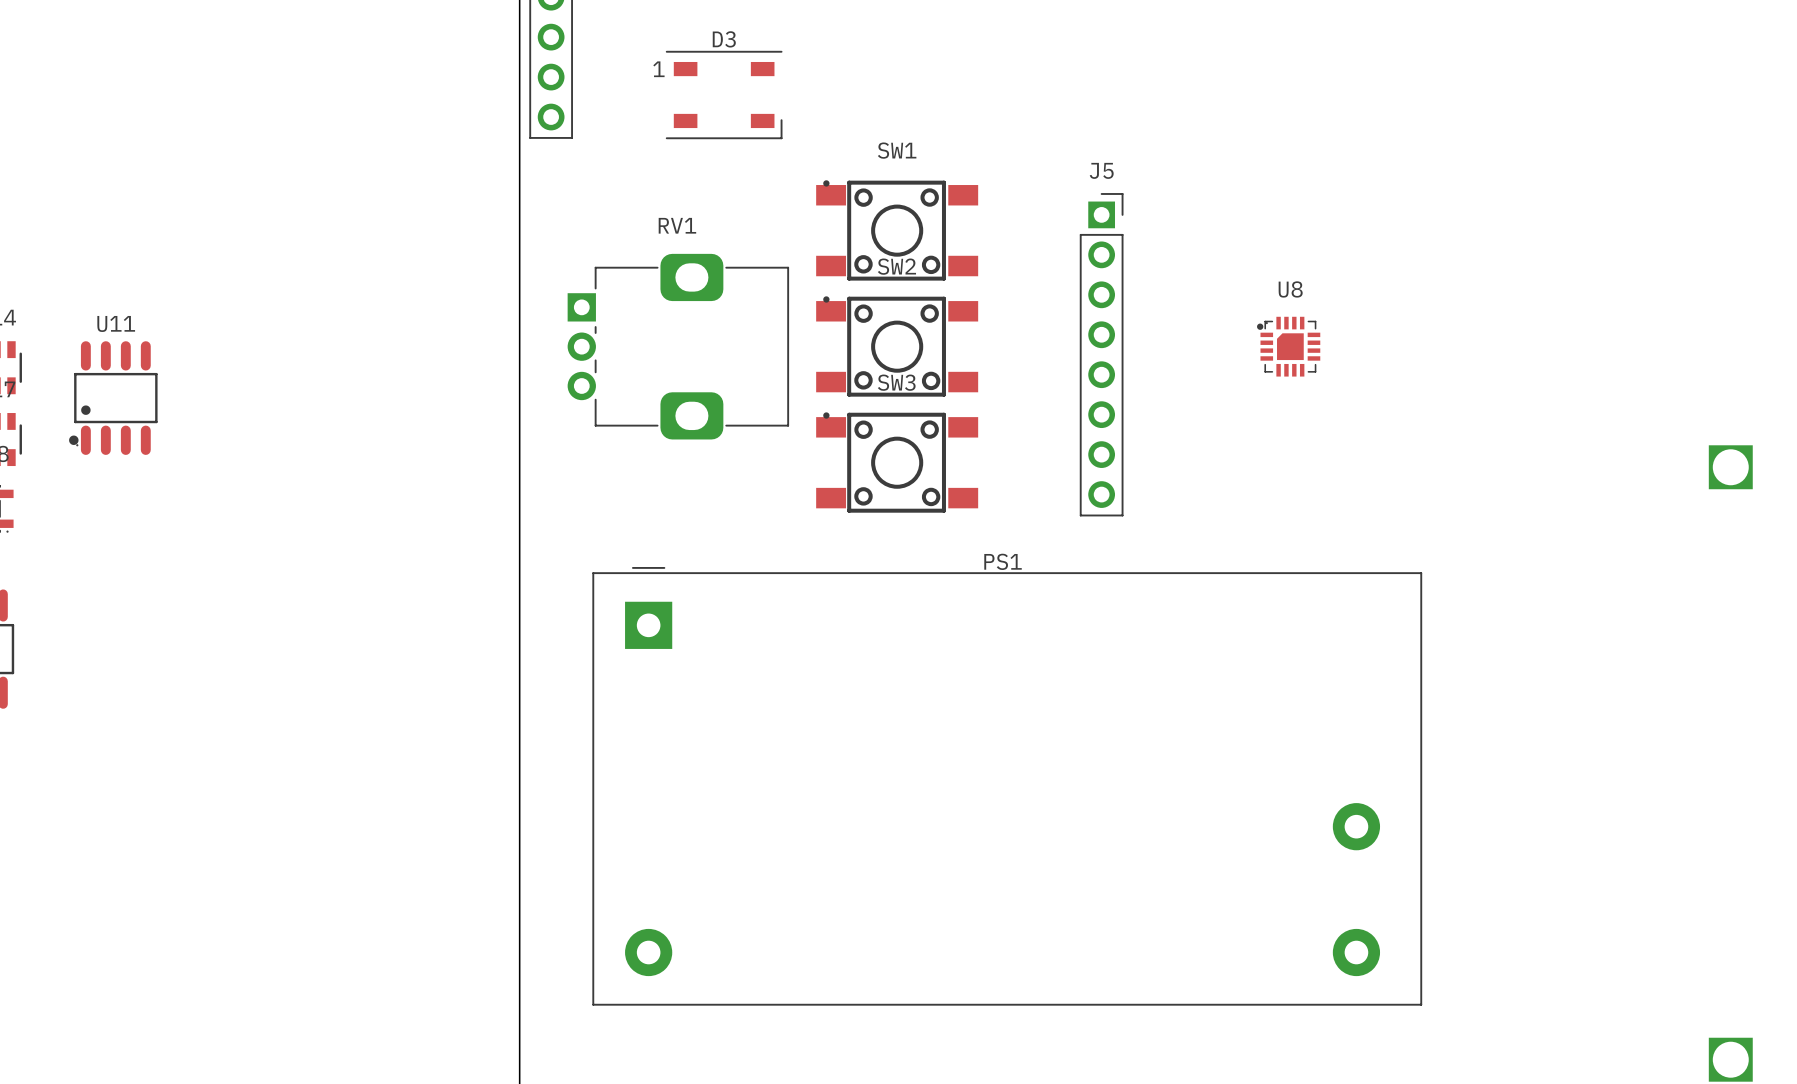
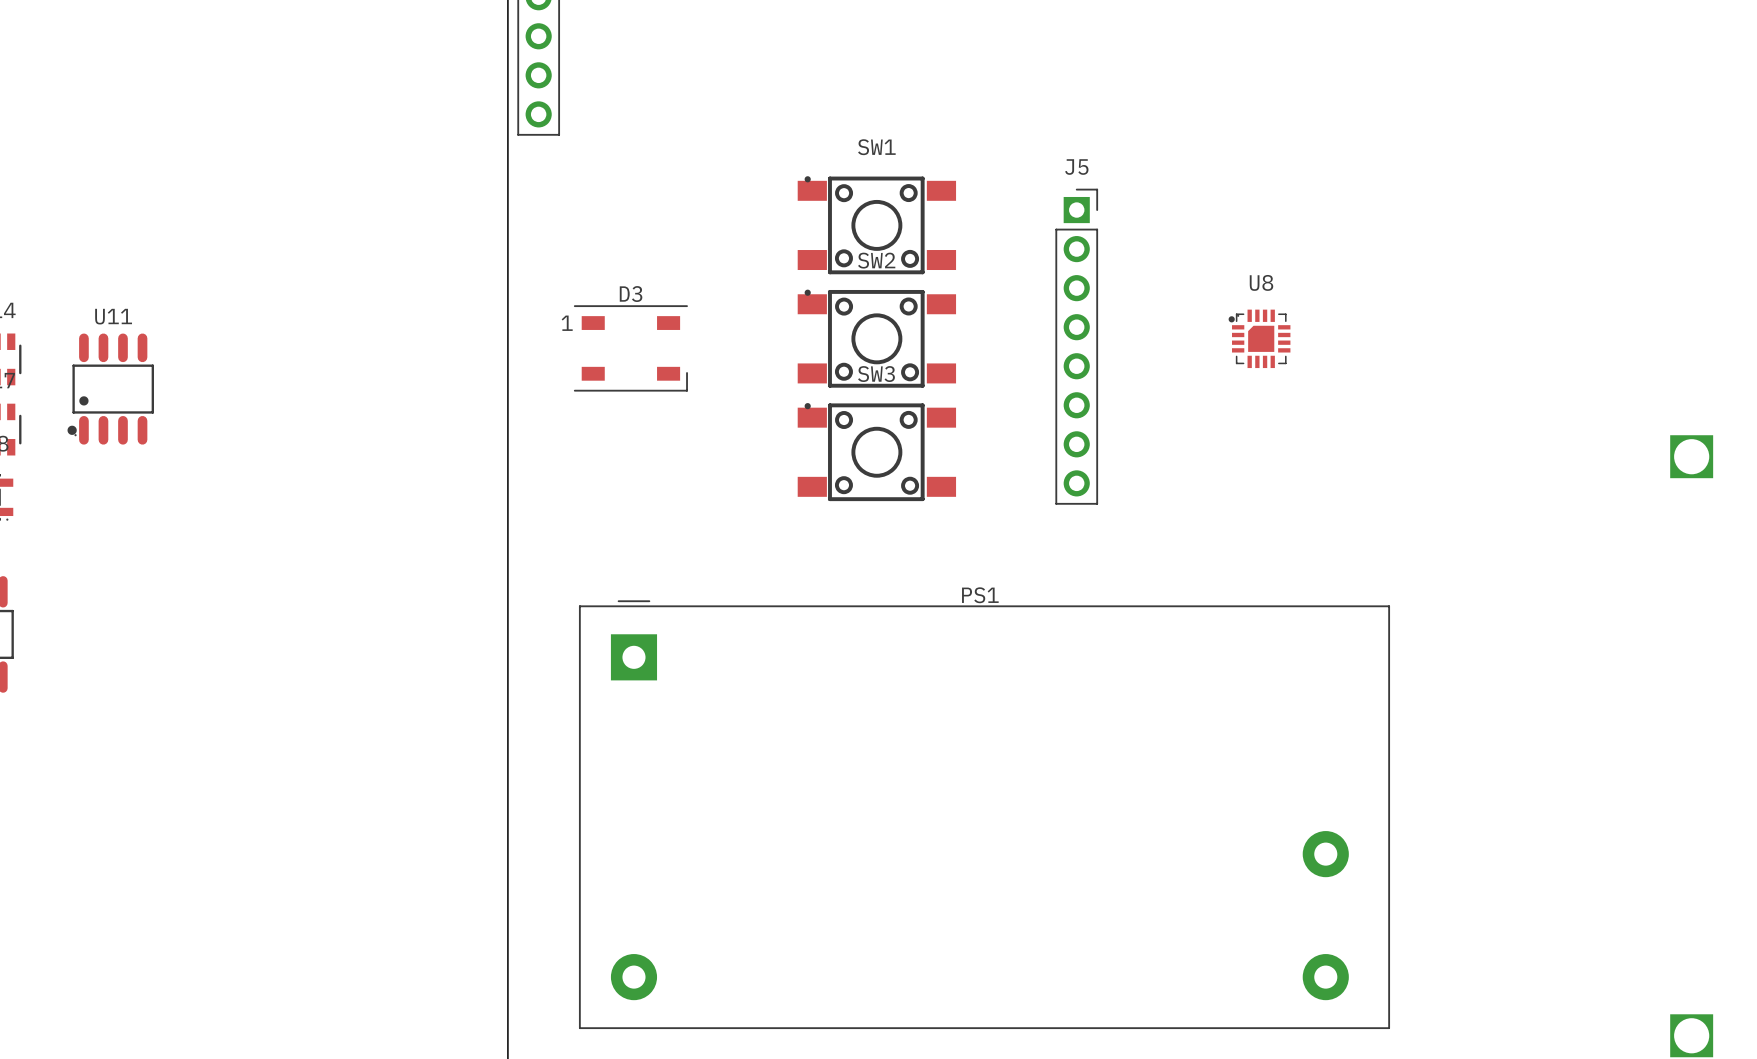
D3 position: (724, 95) -> (630, 348)
RV1: (678, 346) -> none
PS1 position: (1007, 786) -> (984, 814)

